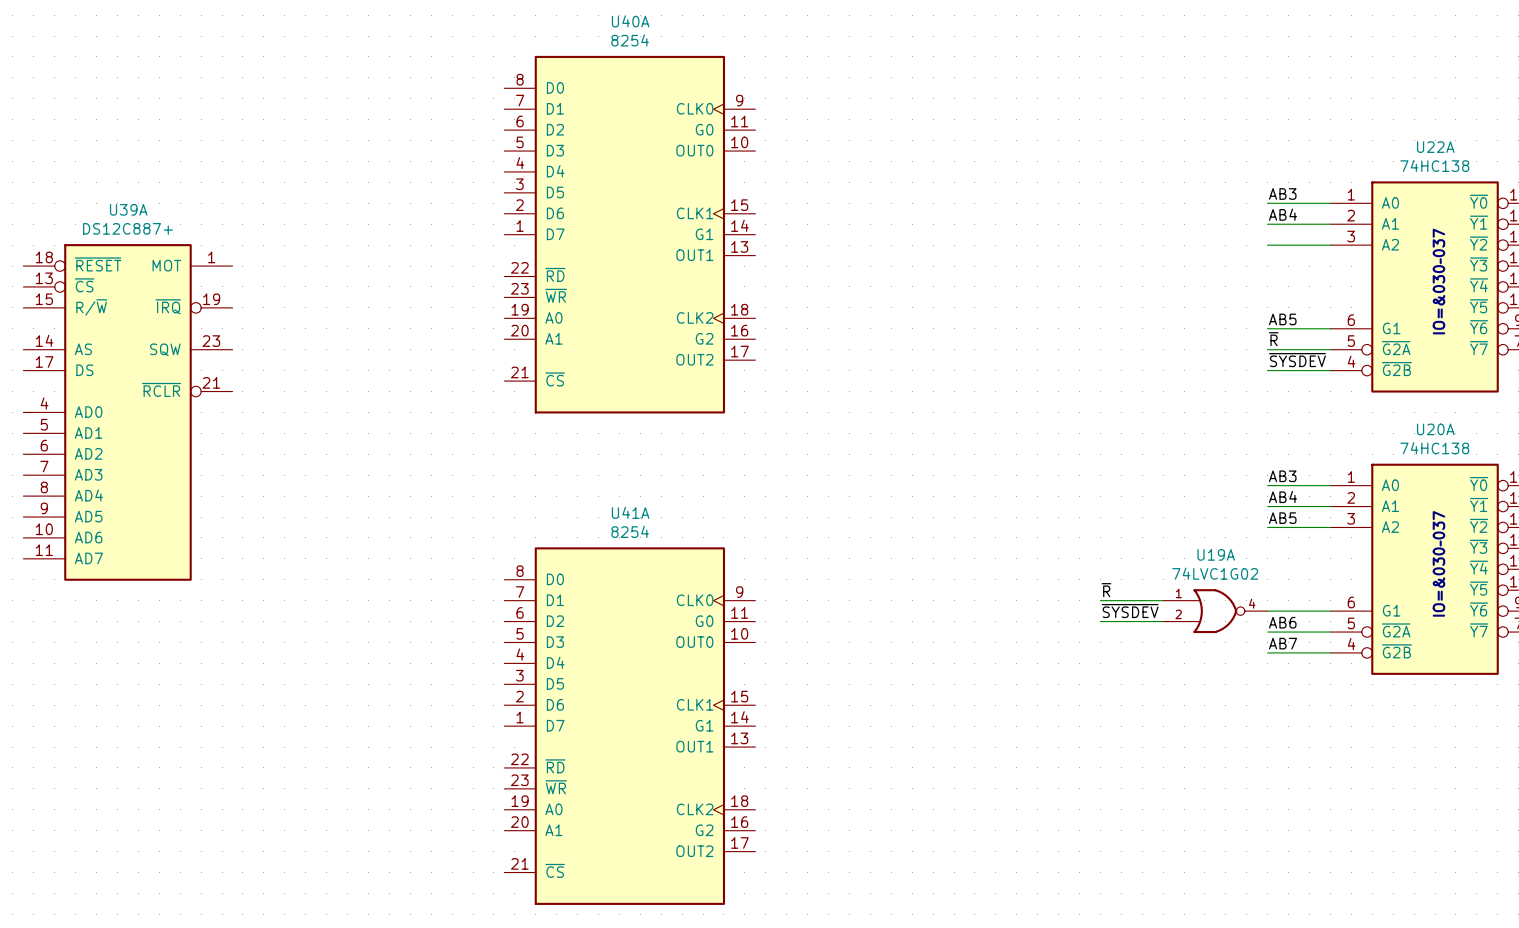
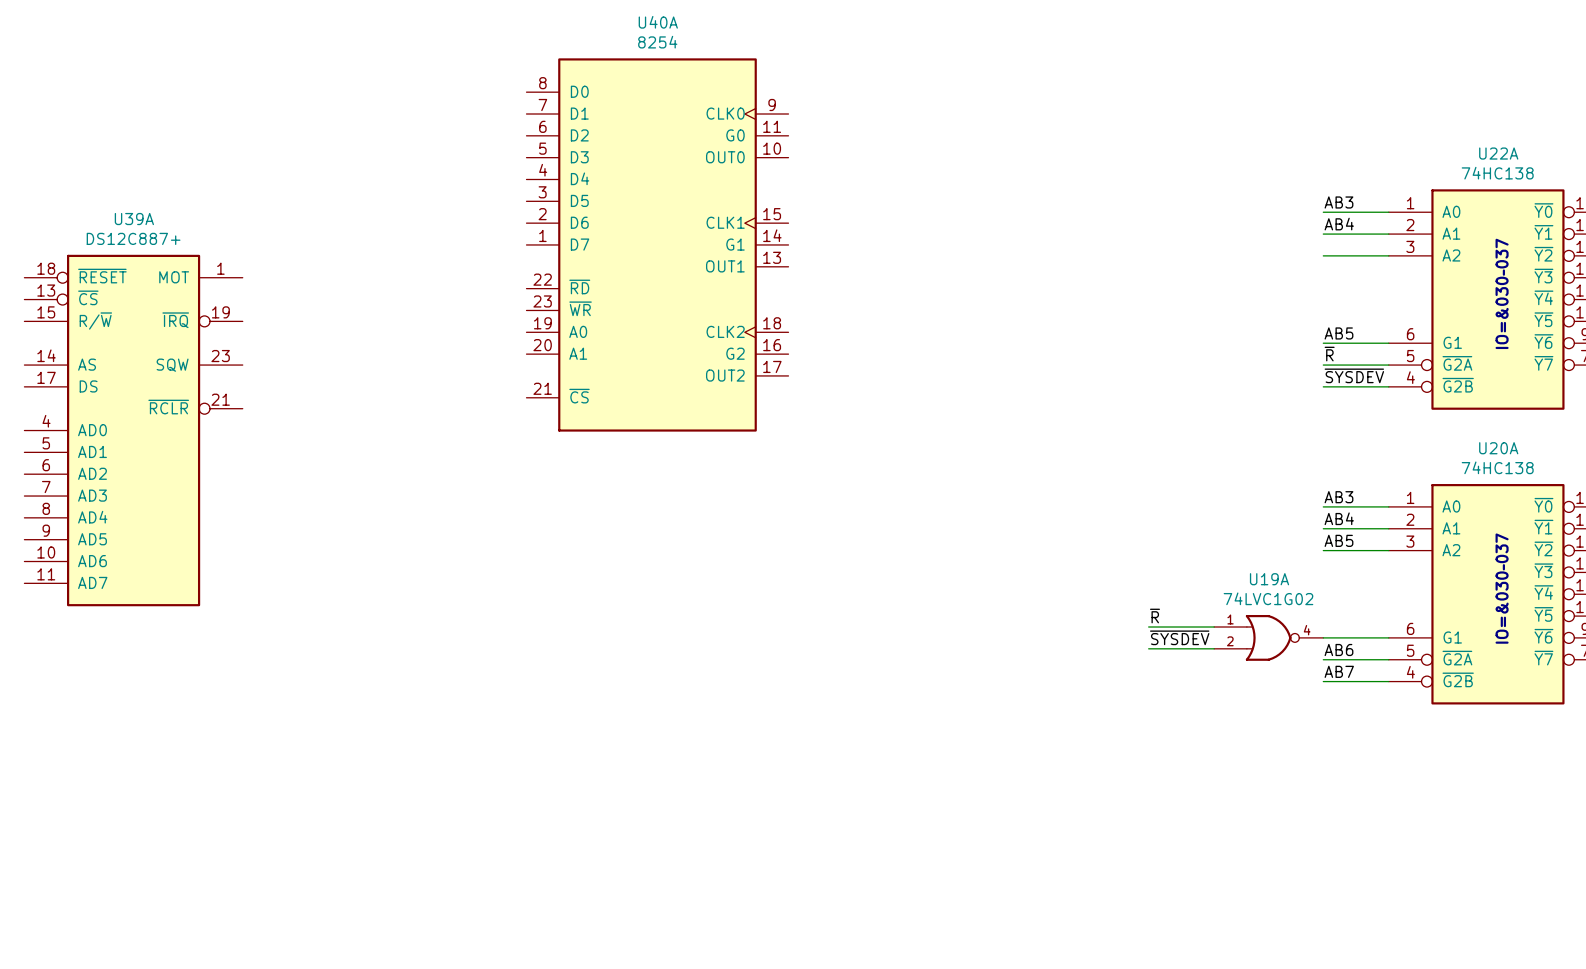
U41A: 8254 (629, 726) -> none

